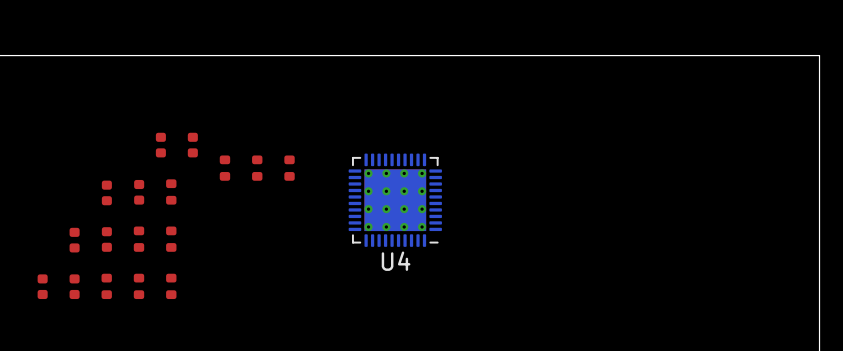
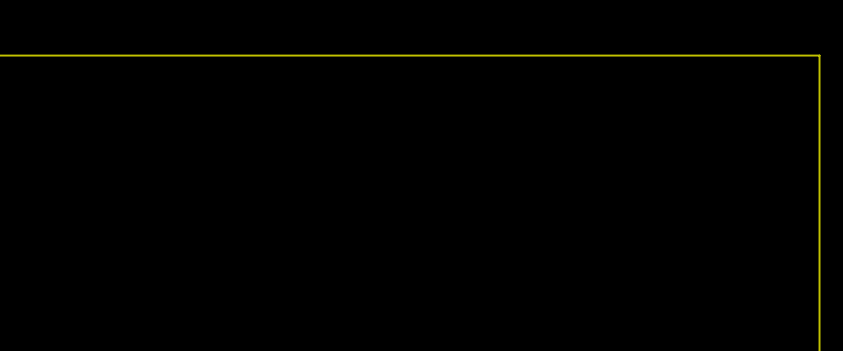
part: (160, 145) -> none
part: (192, 145) -> none
part: (224, 168) -> none
part: (257, 168) -> none
part: (289, 168) -> none
part: (171, 191) -> none
part: (106, 192) -> none
part: (139, 192) -> none
U4: (395, 200) -> none
part: (106, 239) -> none
part: (138, 239) -> none
part: (171, 239) -> none
part: (74, 240) -> none
part: (42, 286) -> none
part: (74, 286) -> none
part: (106, 286) -> none
part: (138, 286) -> none
part: (171, 286) -> none

